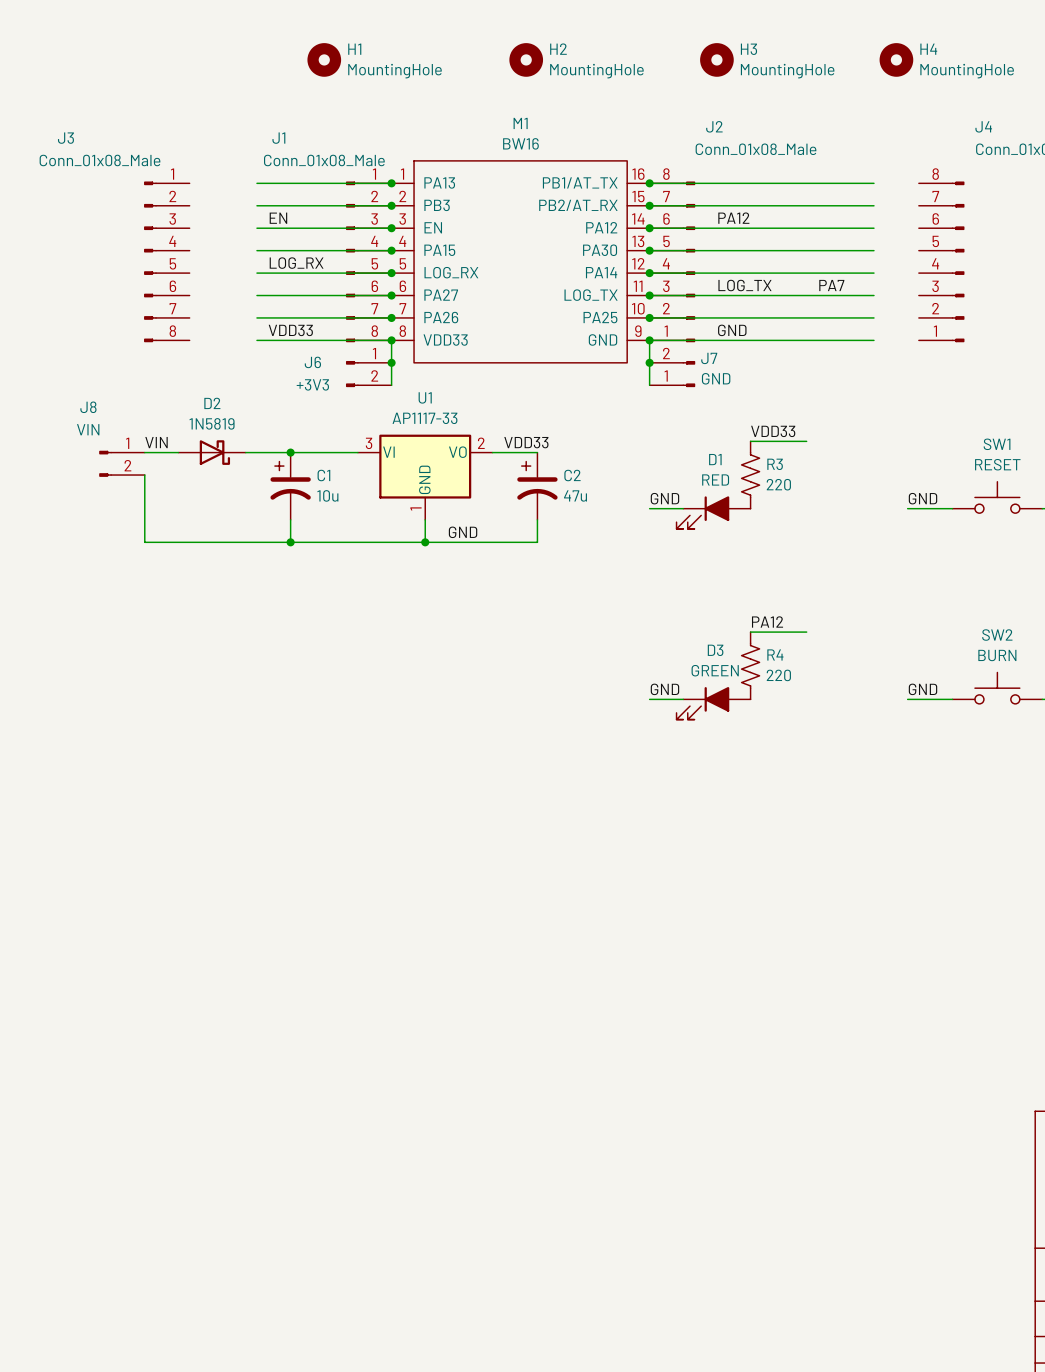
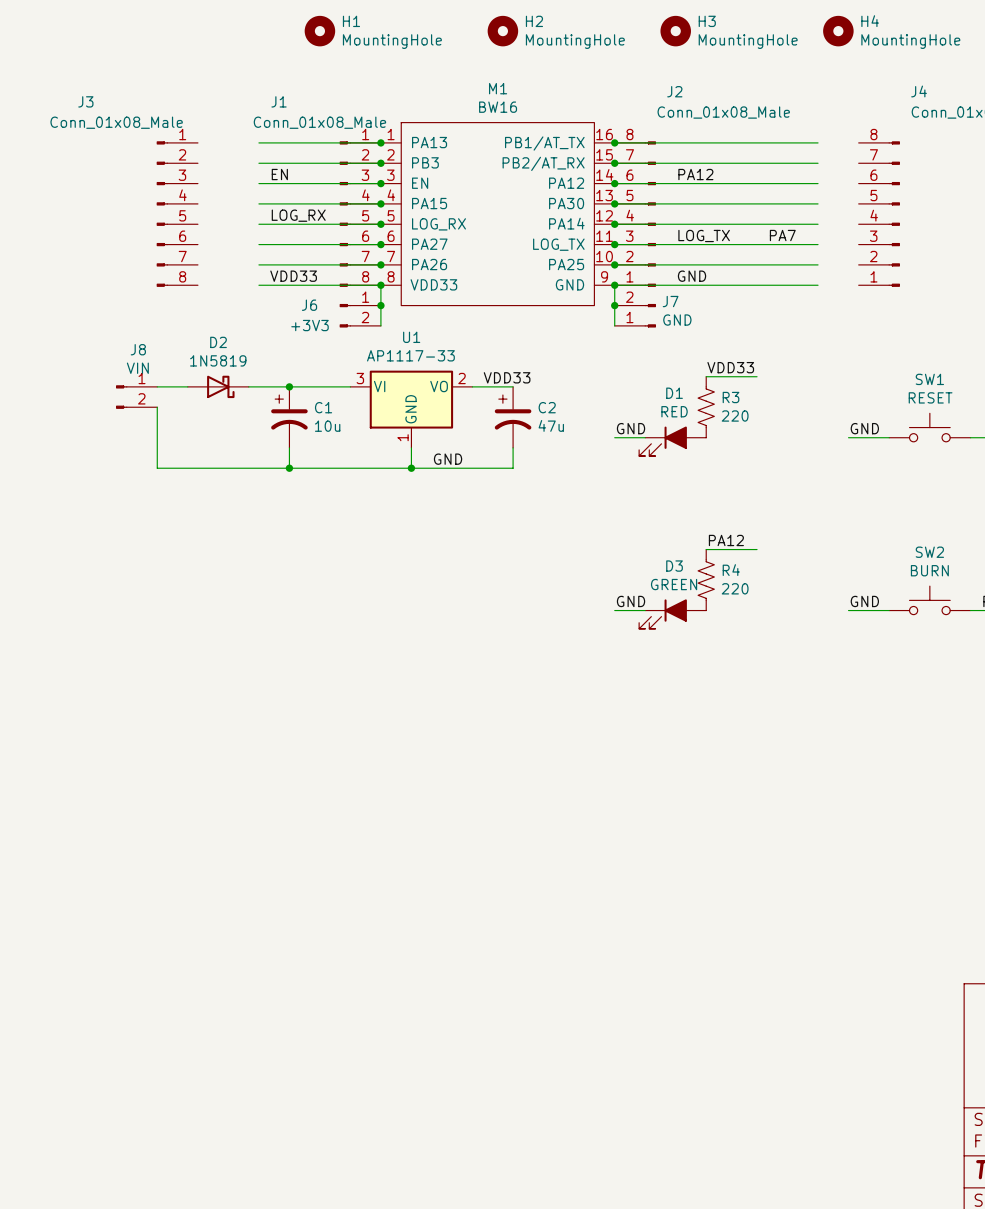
J8 name position: J8 (88, 407) -> J8 (138, 349)
J8 value position: VIN (88, 429) -> VIN (137, 368)
label: VIN (156, 442) -> none

